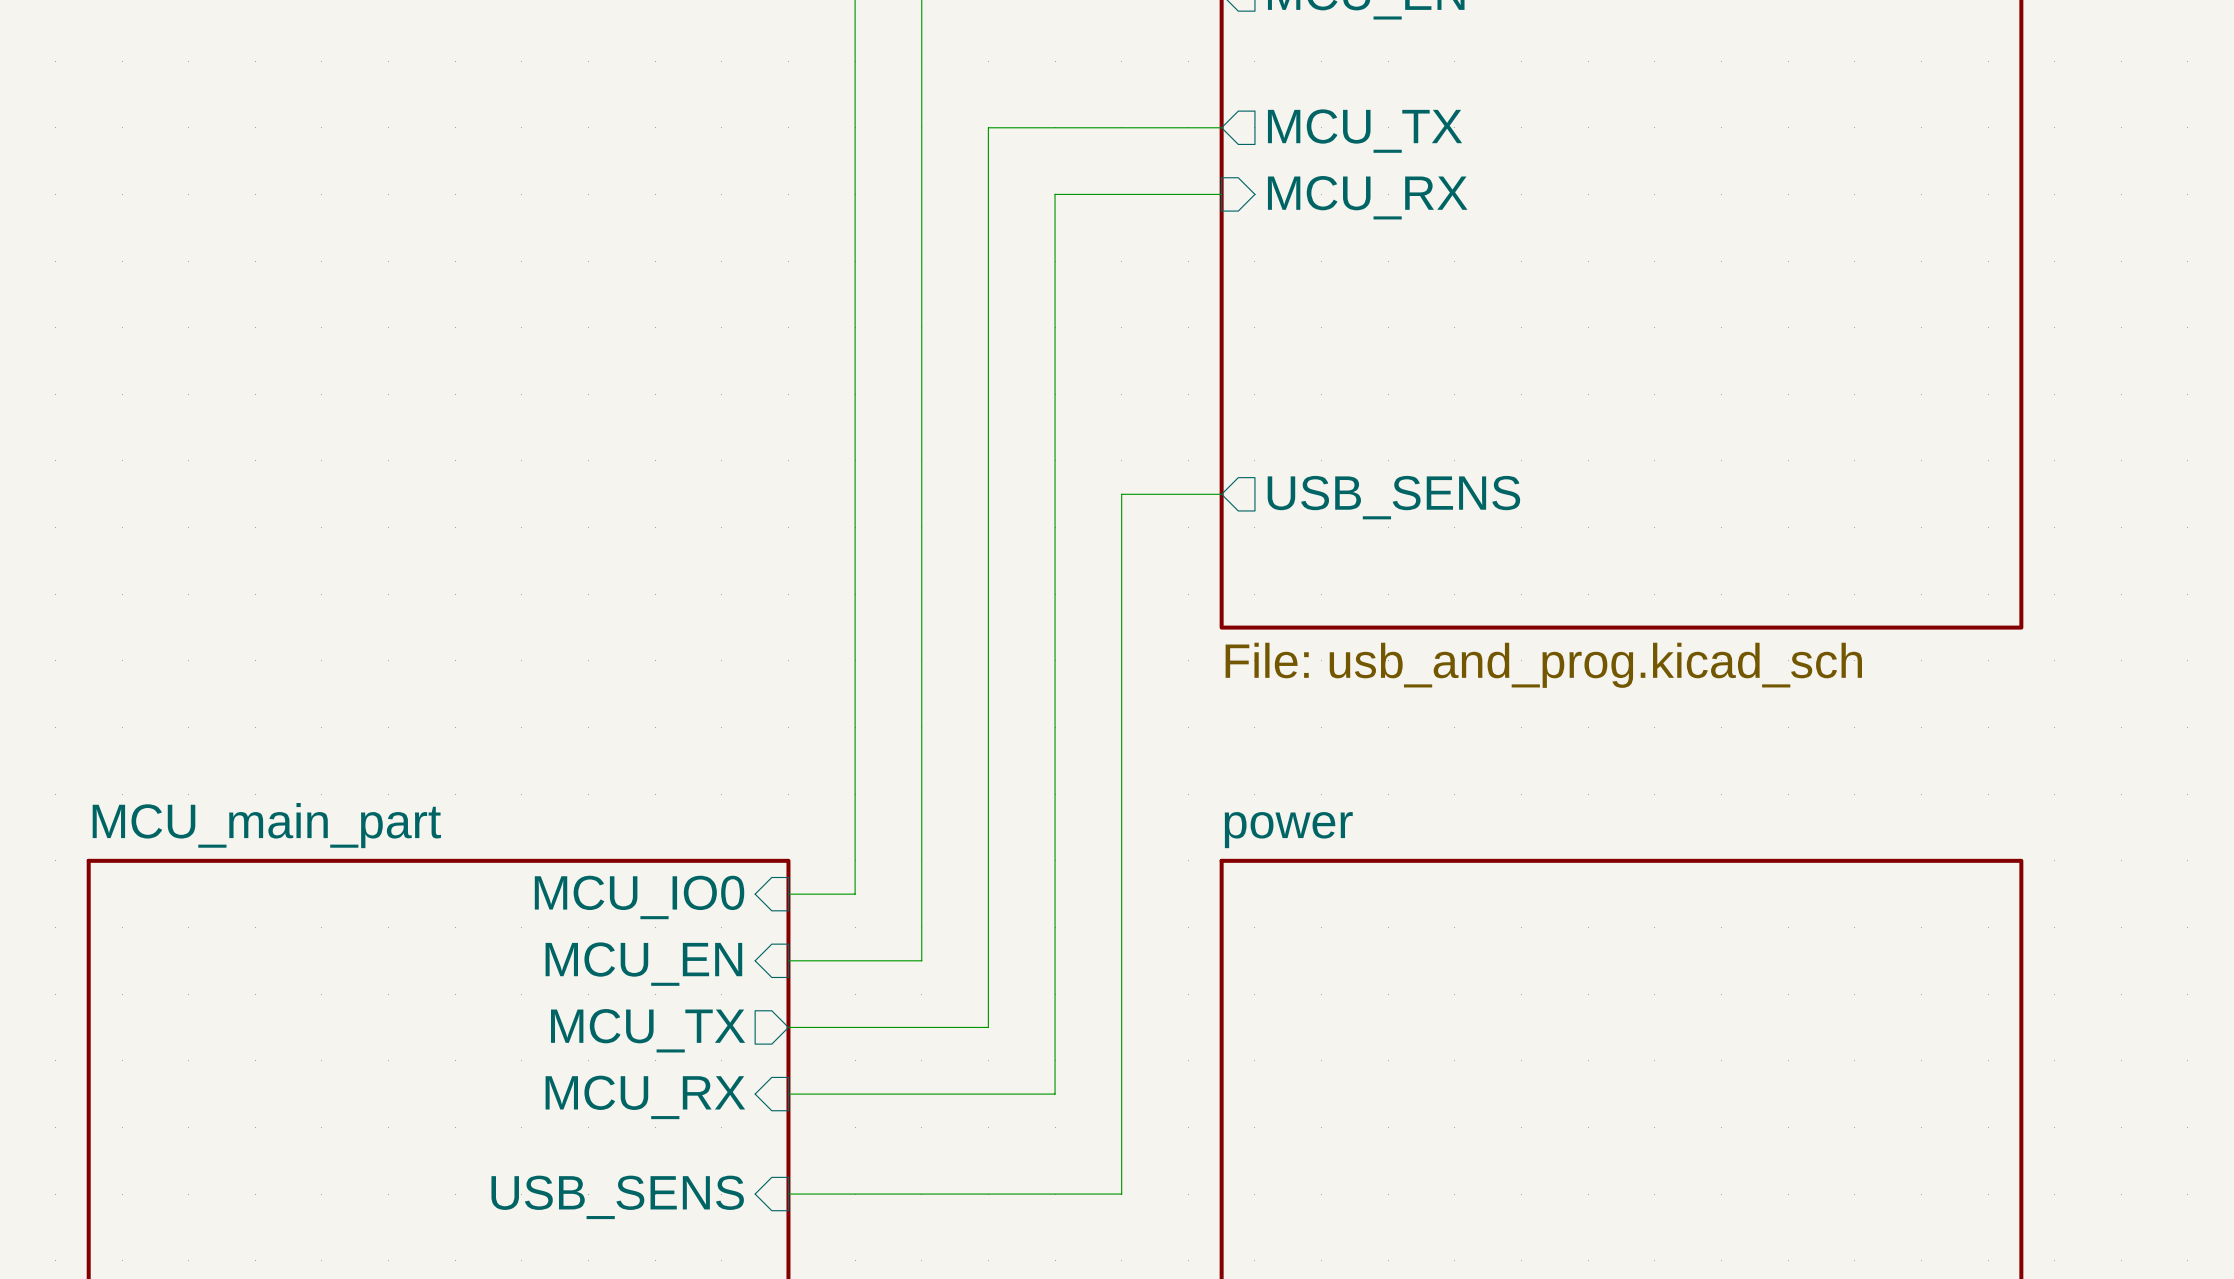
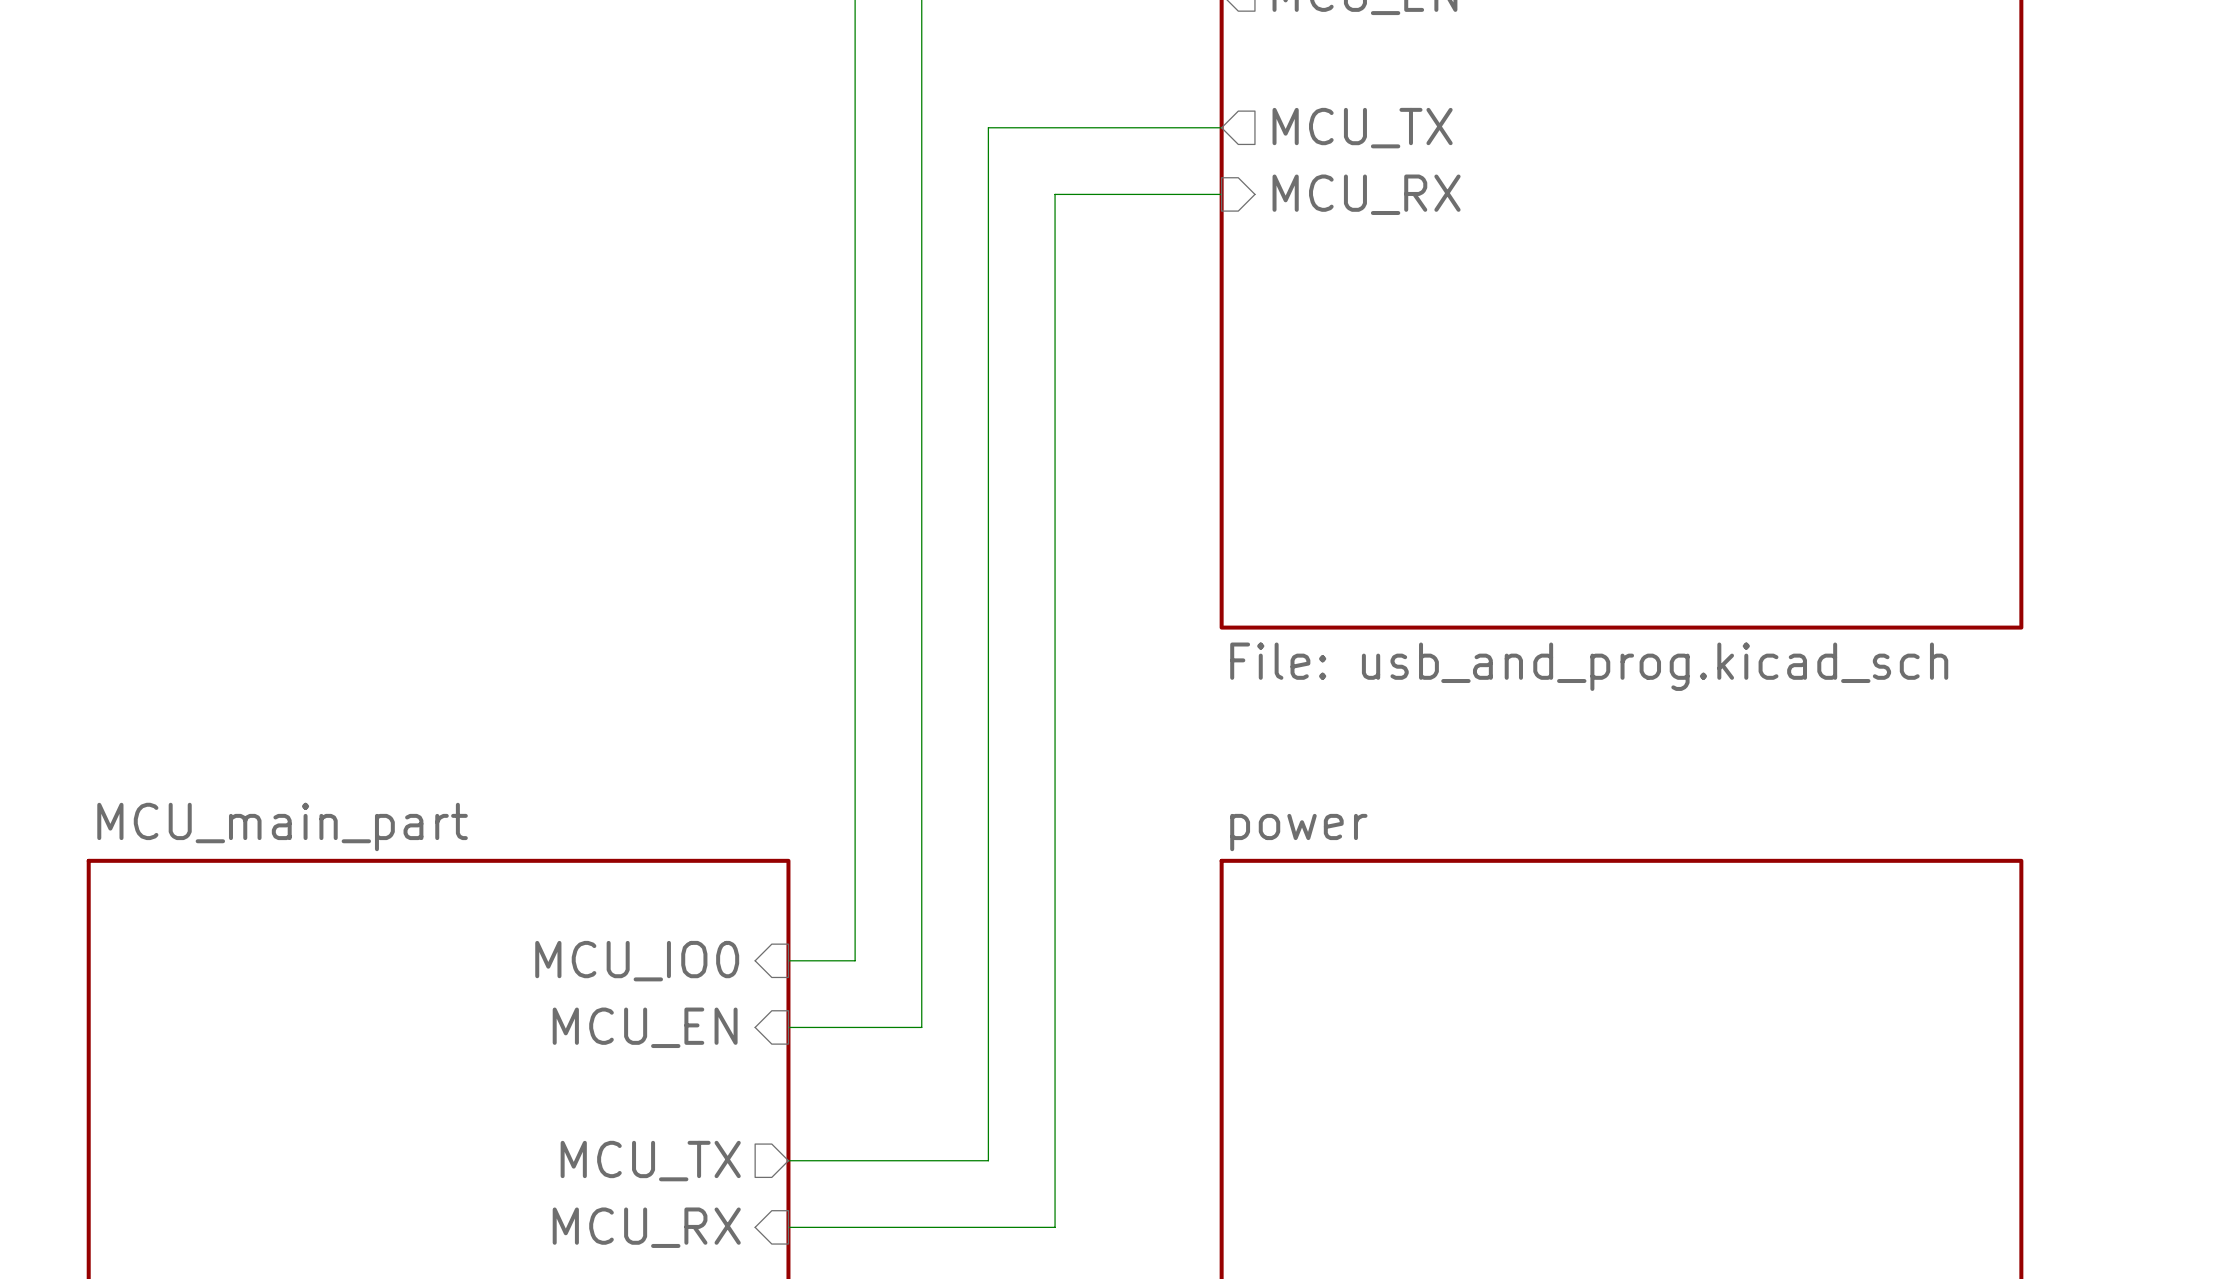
wire: (1221, 494) (1121, 494) (1121, 1194) (788, 1194) -> none
sheet pin: USB_SENS (1393, 497) -> none
wire: (788, 894) (855, 894) -> none
sheet pin: MCU_IO0 (639, 897) -> none
wire: (855, 960) (921, 960) -> (855, 960) (855, 894)
sheet pin: MCU_EN (643, 964) -> MCU_IO0 (637, 961)
wire: (921, 1027) (988, 1027) -> (921, 1027) (921, 960)
wire: none -> (988, 1027) (988, 1160) (788, 1160)
sheet pin shape: output (648, 1030) -> input (645, 1027)
sheet pin: MCU_TX (648, 1030) -> MCU_EN (645, 1027)
wire: (788, 1094) (1055, 1094) -> (788, 1227) (1055, 1227) (1055, 1094)
sheet pin position: MCU_RX (645, 1097) -> MCU_RX (646, 1227)
sheet pin: none -> MCU_TX (650, 1161)
sheet pin: USB_SENS (617, 1197) -> none

